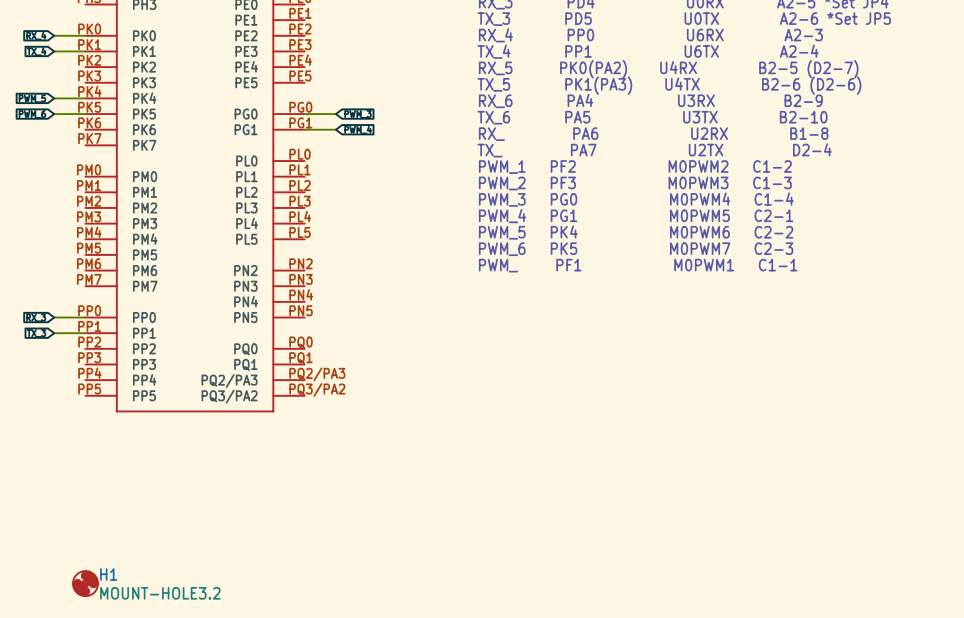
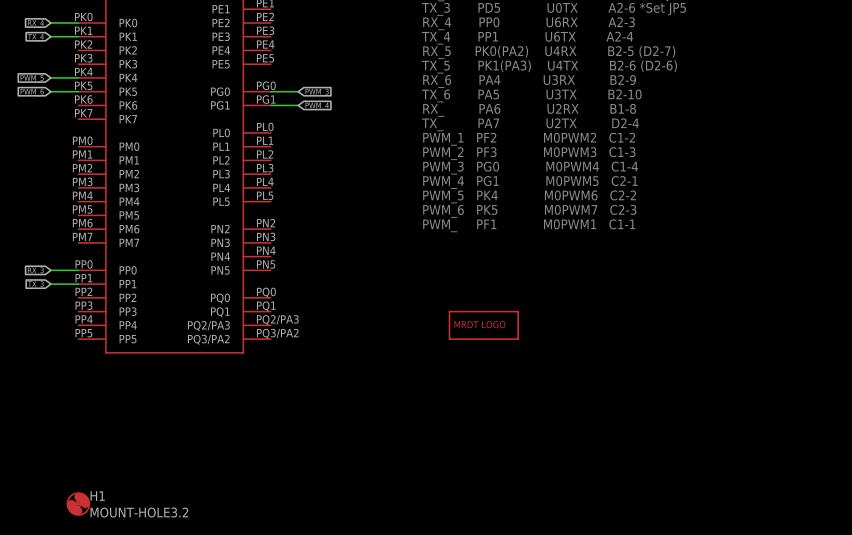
part: none -> (483, 325)

